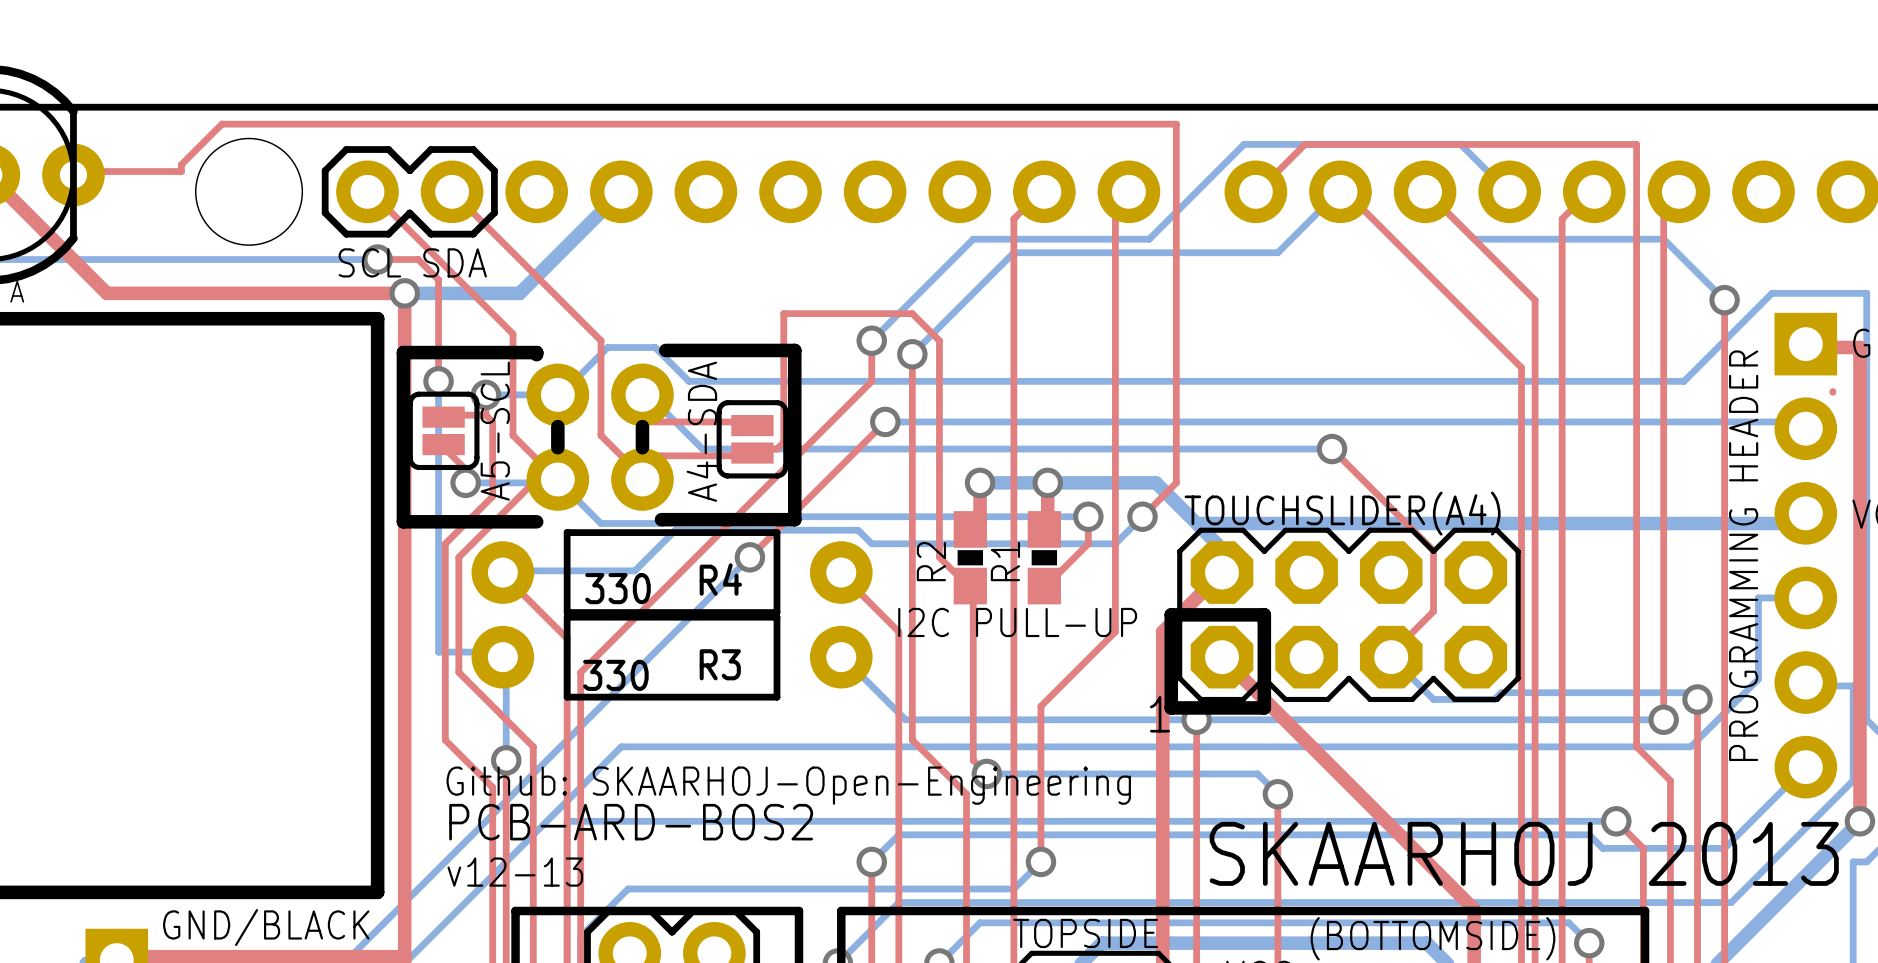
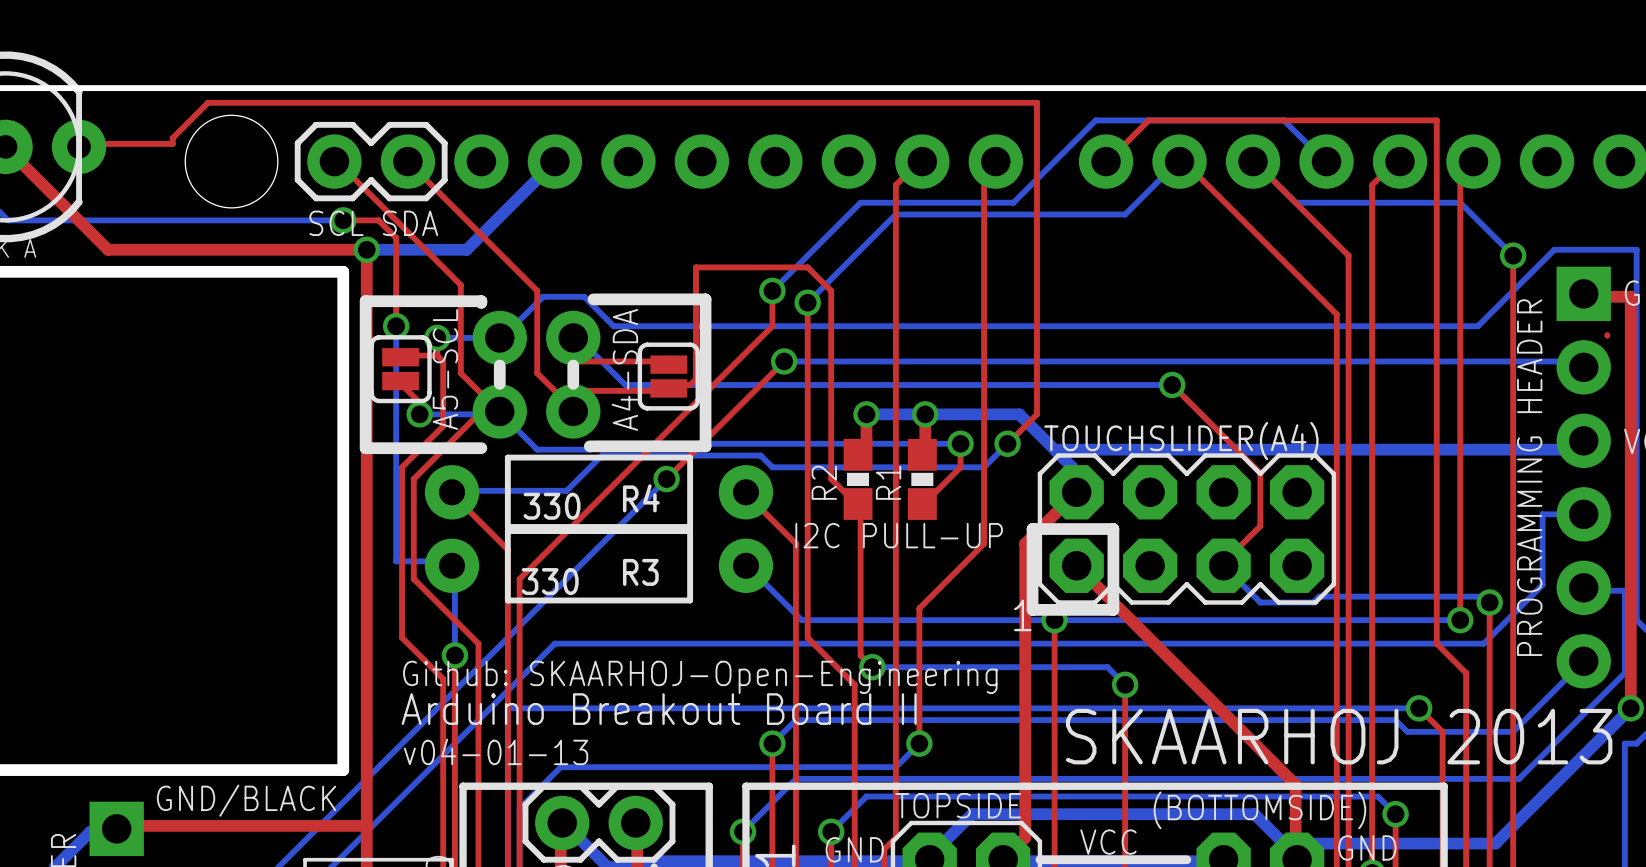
text: PCB-ARD-BOS2 (631, 822) -> Arduino Breakout Board II (659, 709)
text: v12-13 (515, 872) -> v04-01-13 (496, 751)

